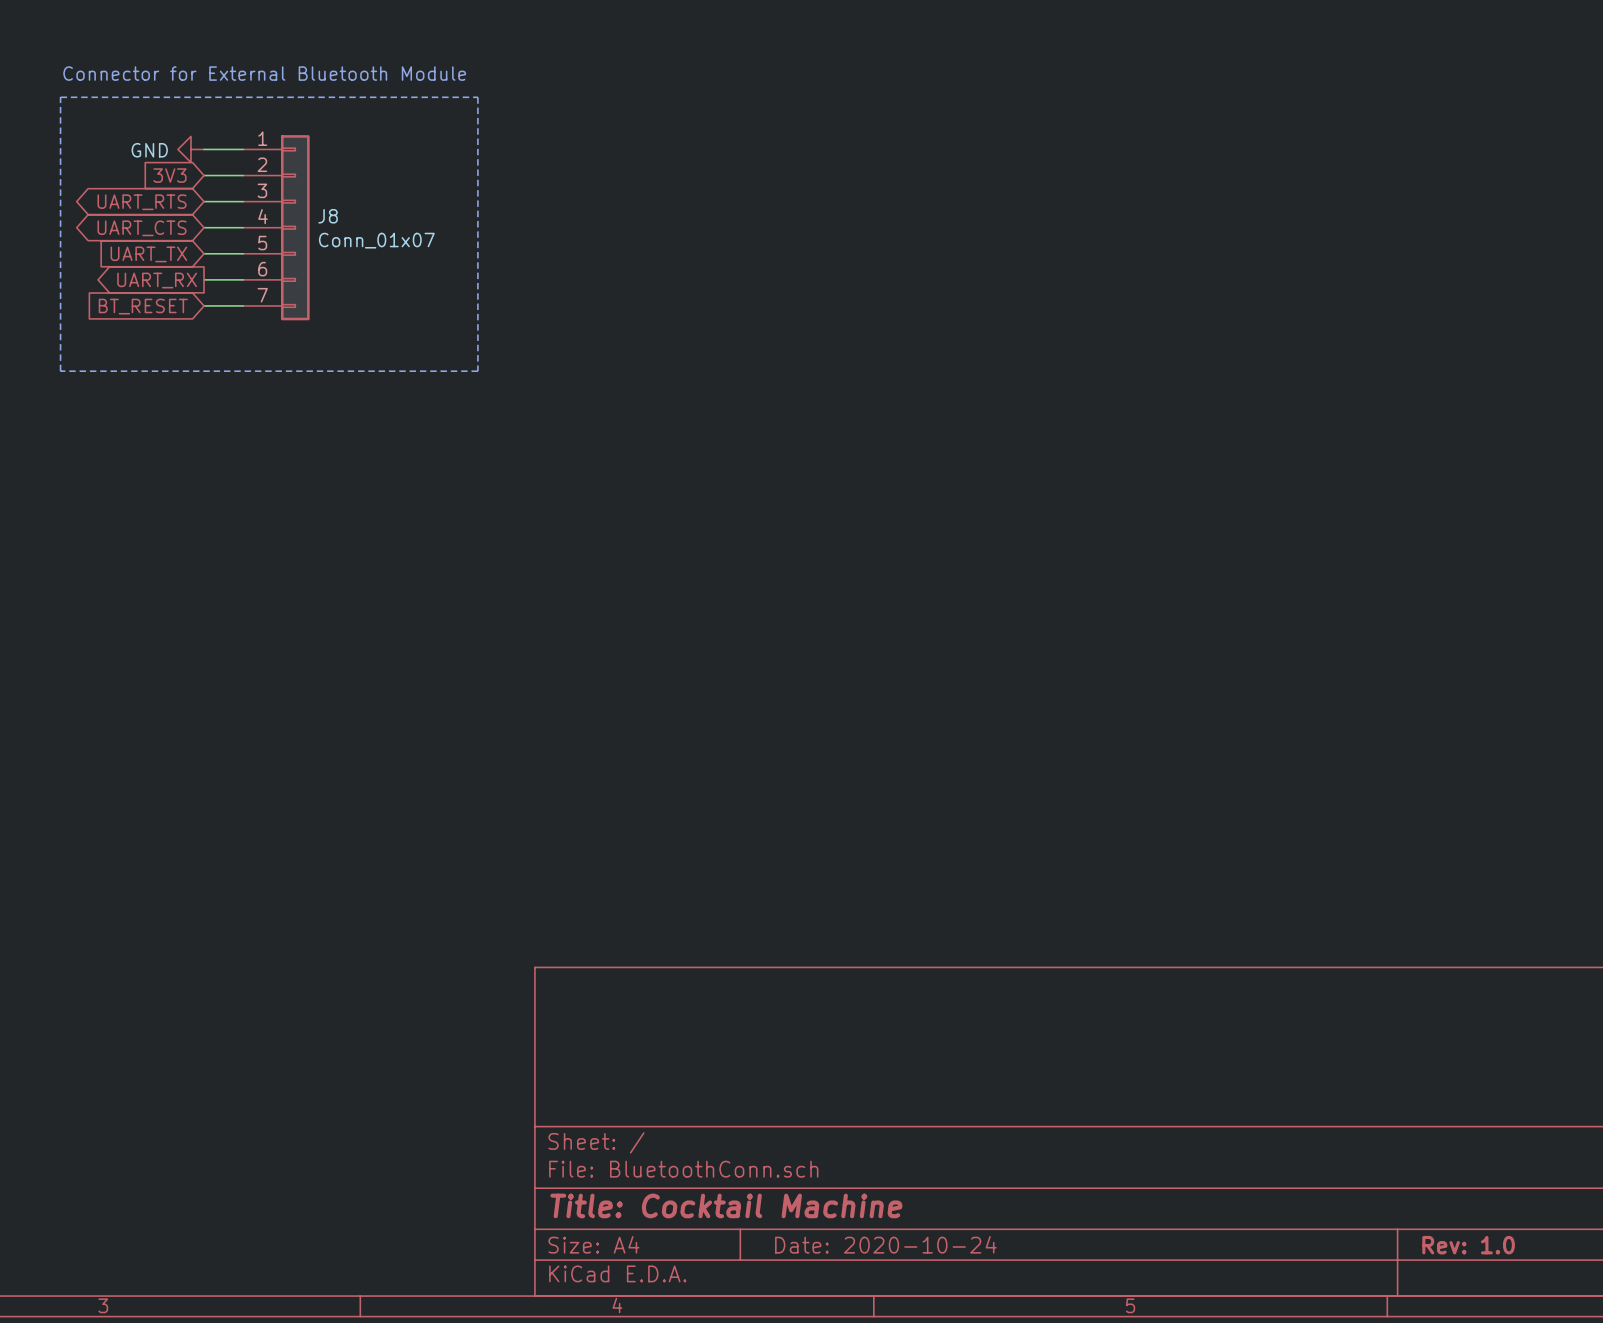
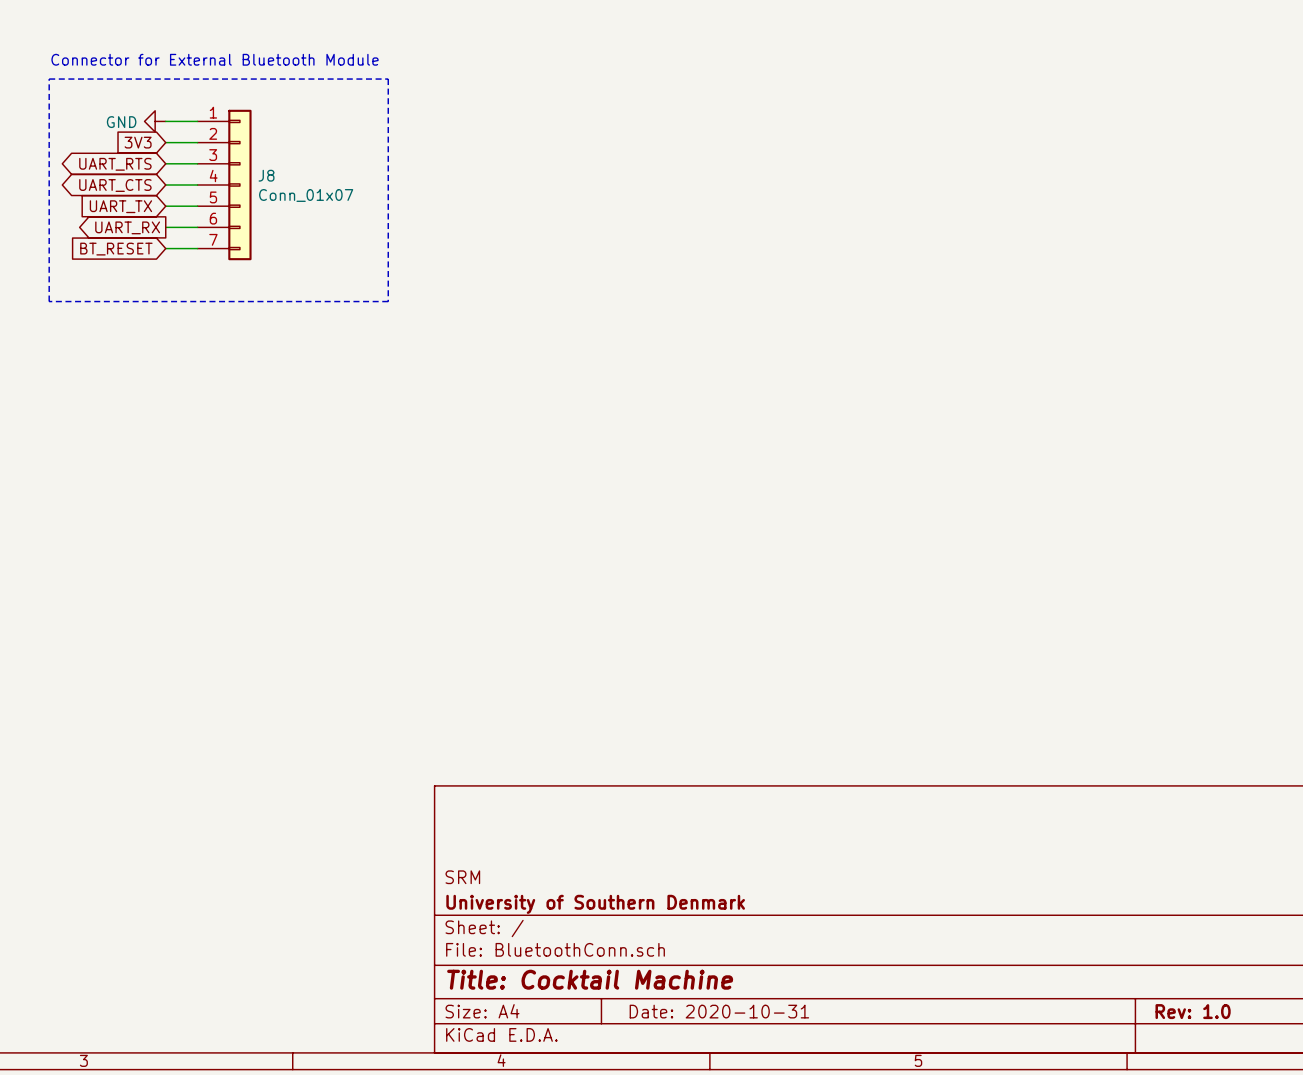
title block: none -> SRM (462, 877)
title block: none -> University of Southern Denmark (595, 904)
title block: Date: 2020-10-24 (885, 1244) -> Date: 2020-10-31 (719, 1011)

